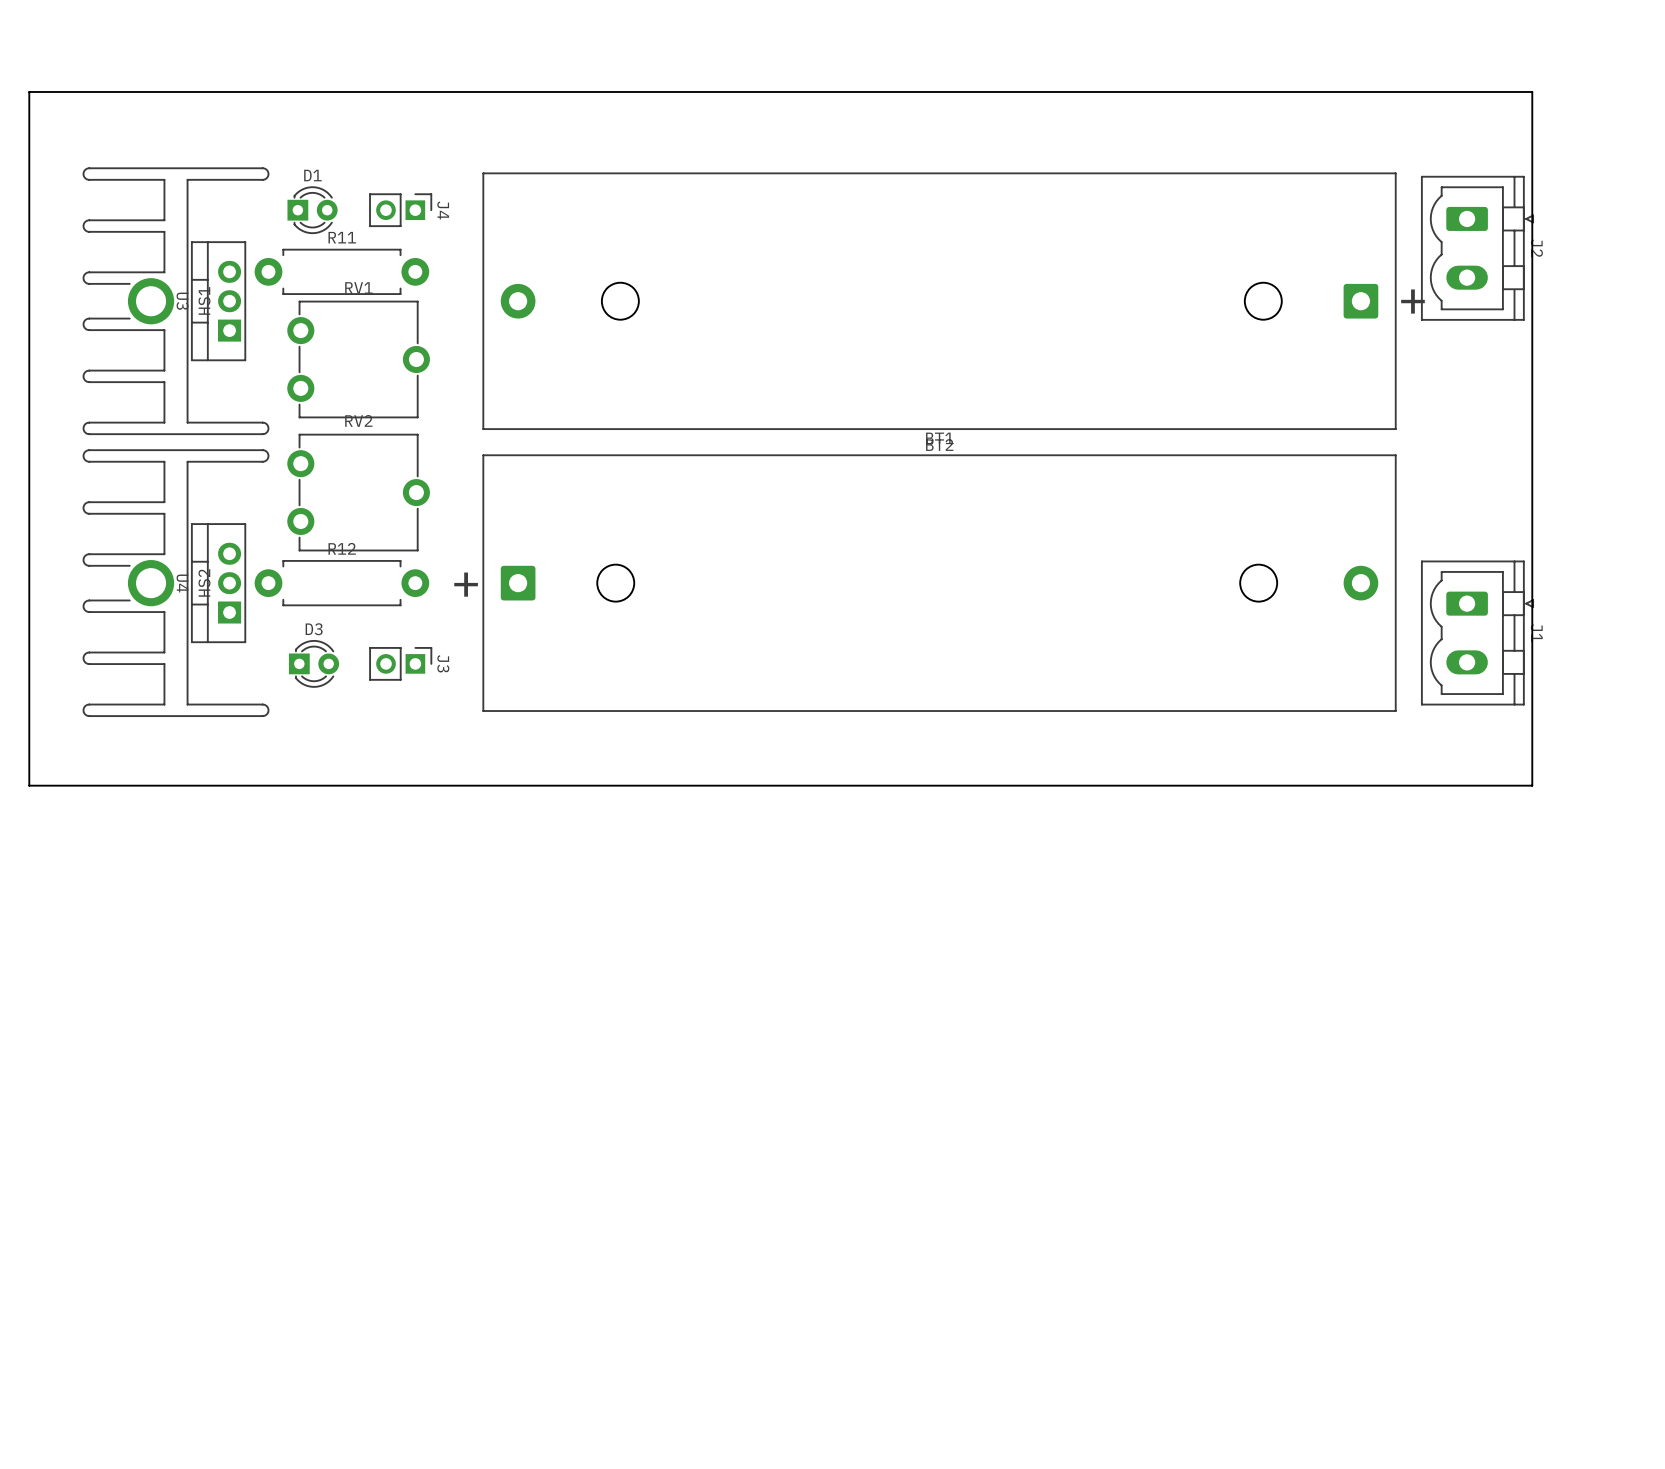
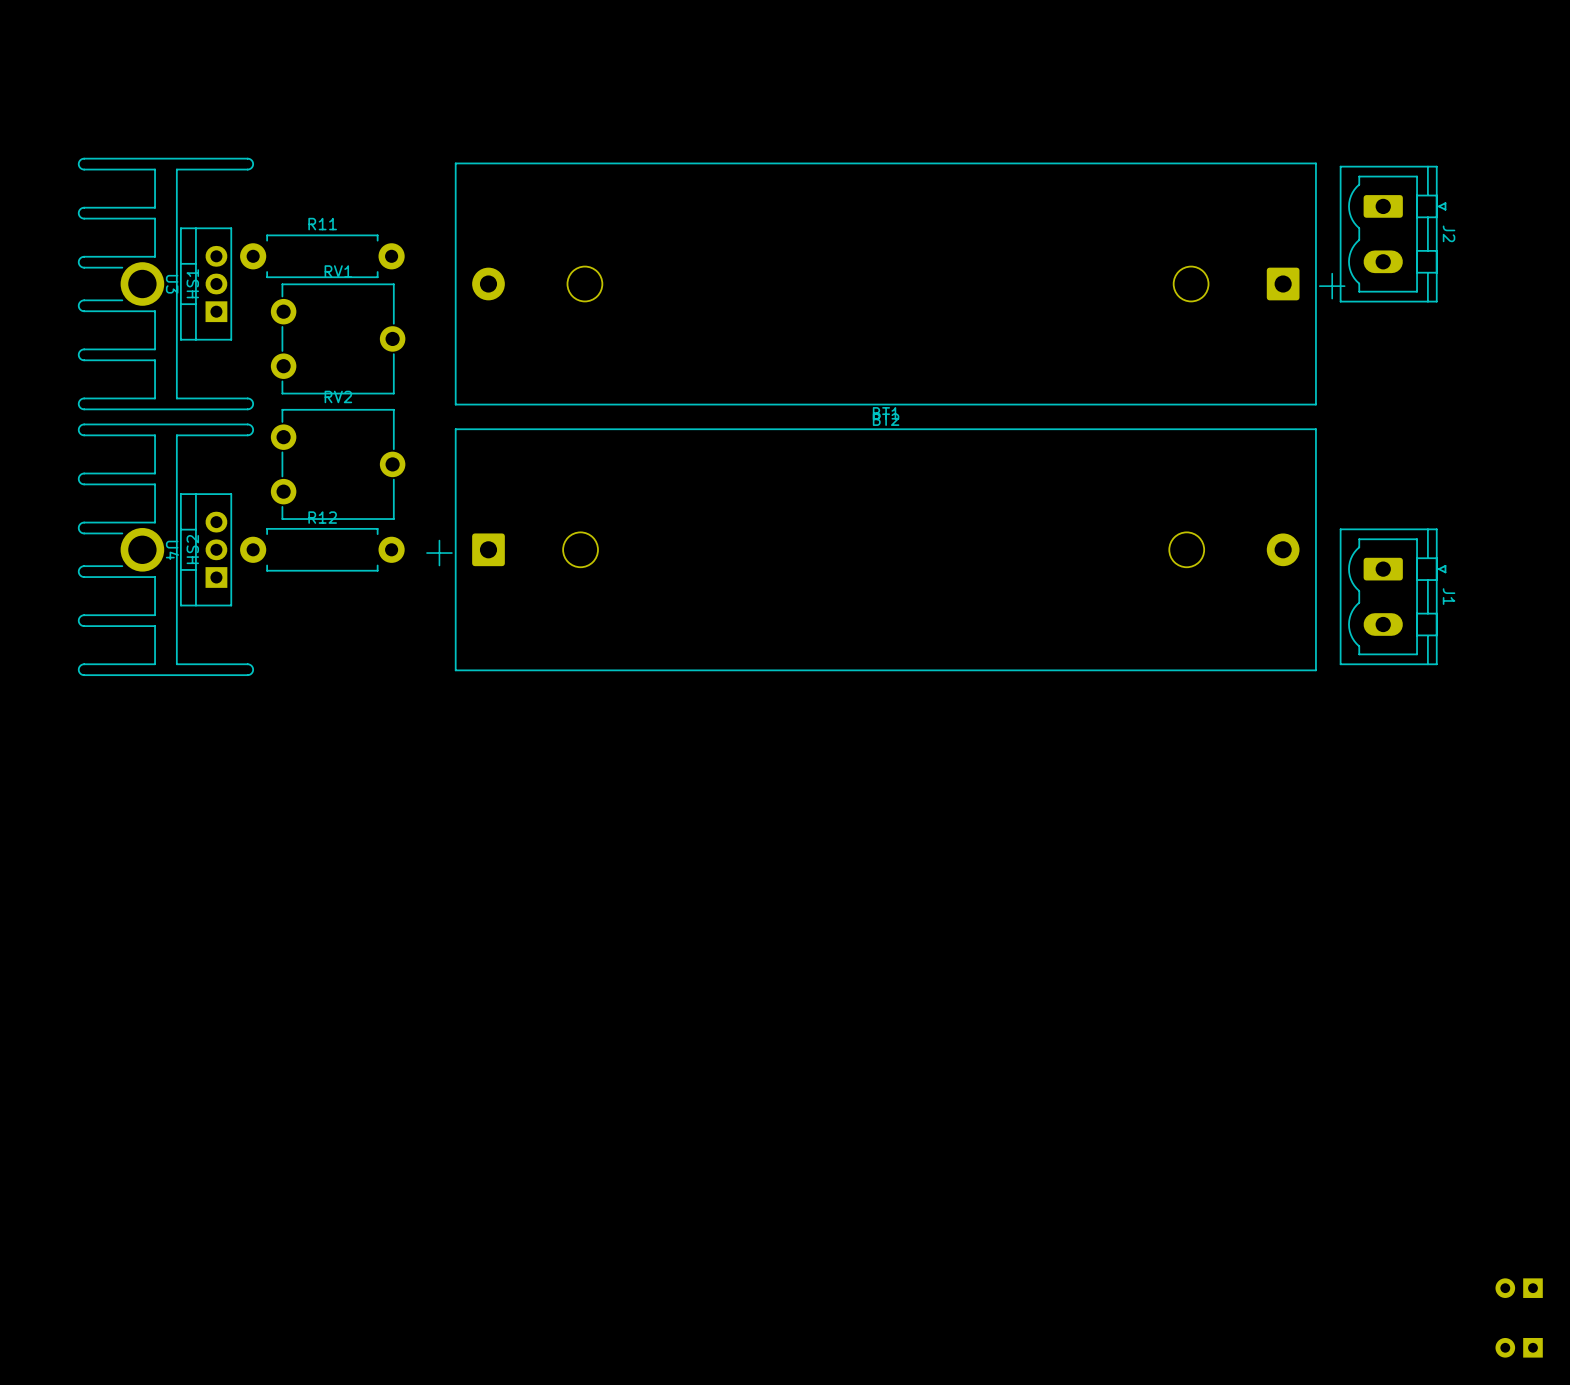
board edge: (1532, 91) (29, 91) (29, 785) (1532, 785) (1532, 91) -> none
D1: (312, 210) -> none
J4: (400, 210) -> none
D3: (314, 663) -> none
J3: (400, 663) -> none
part: none -> (1519, 1288)
part: none -> (1519, 1347)

